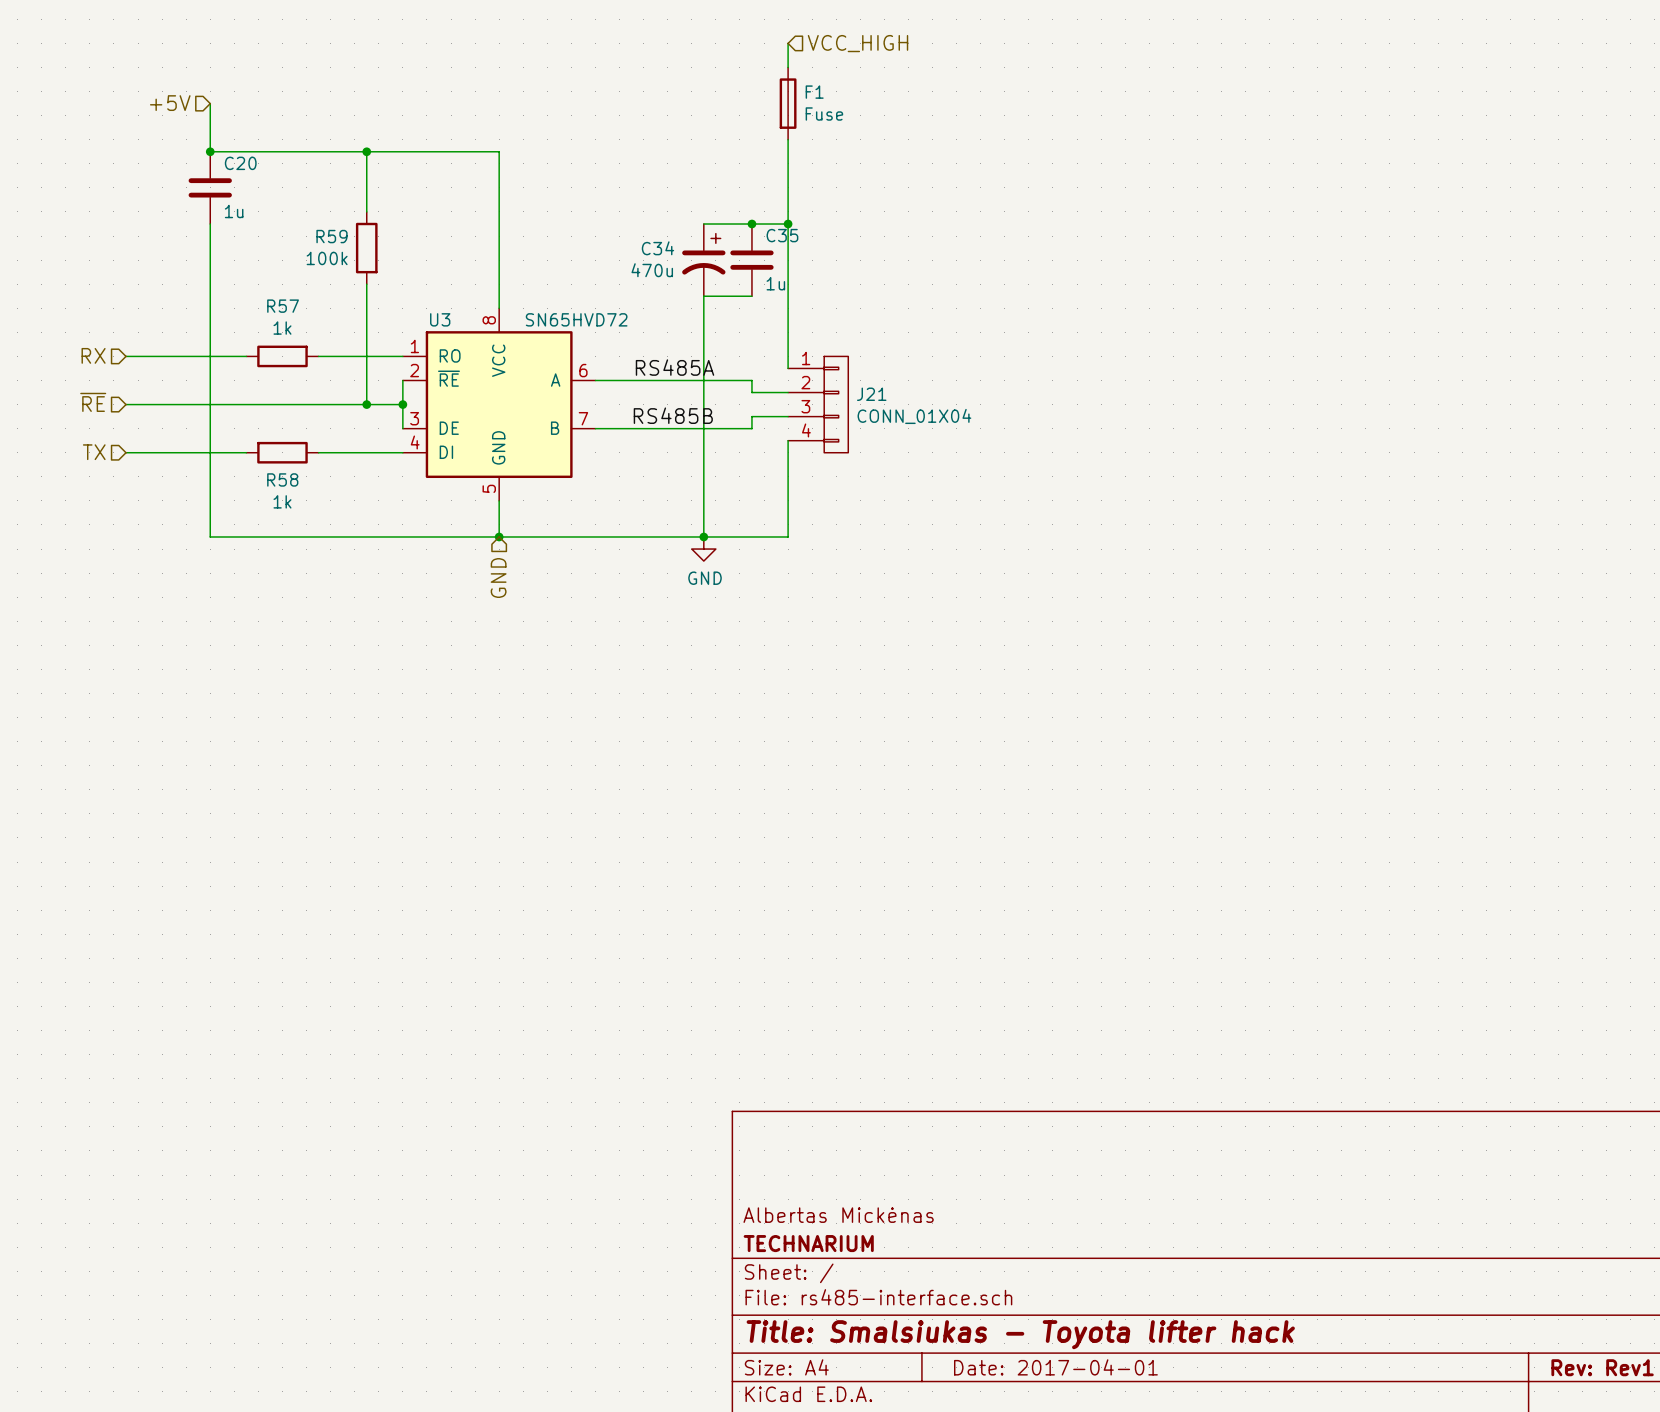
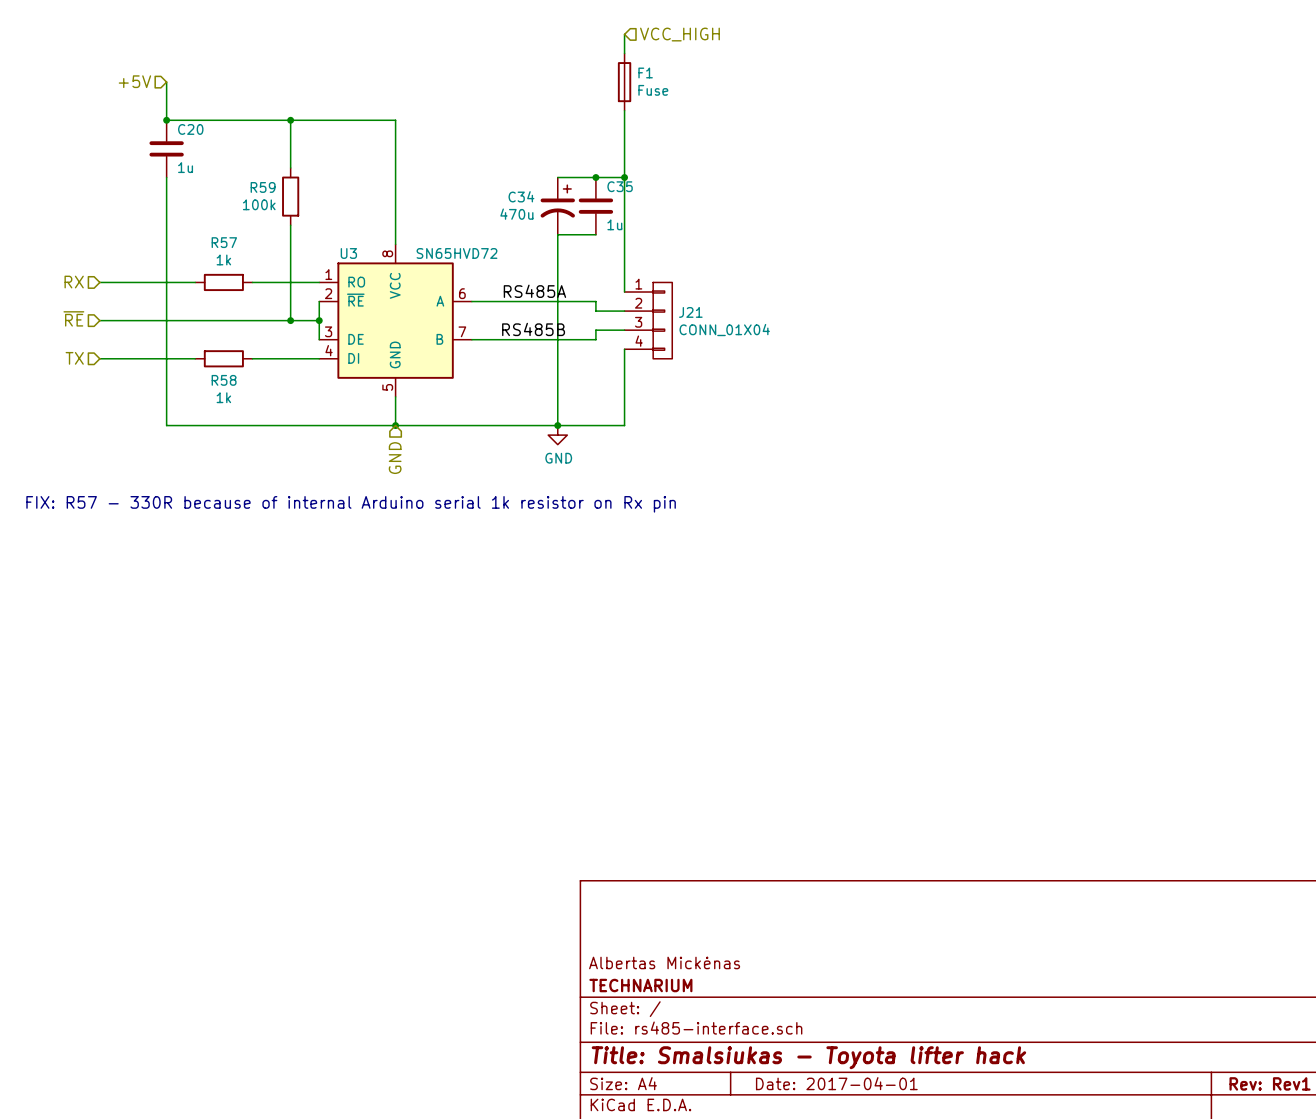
text: none -> FIX: R57 - 330R because of internal Arduino serial 1k resistor on Rx pin (351, 504)

